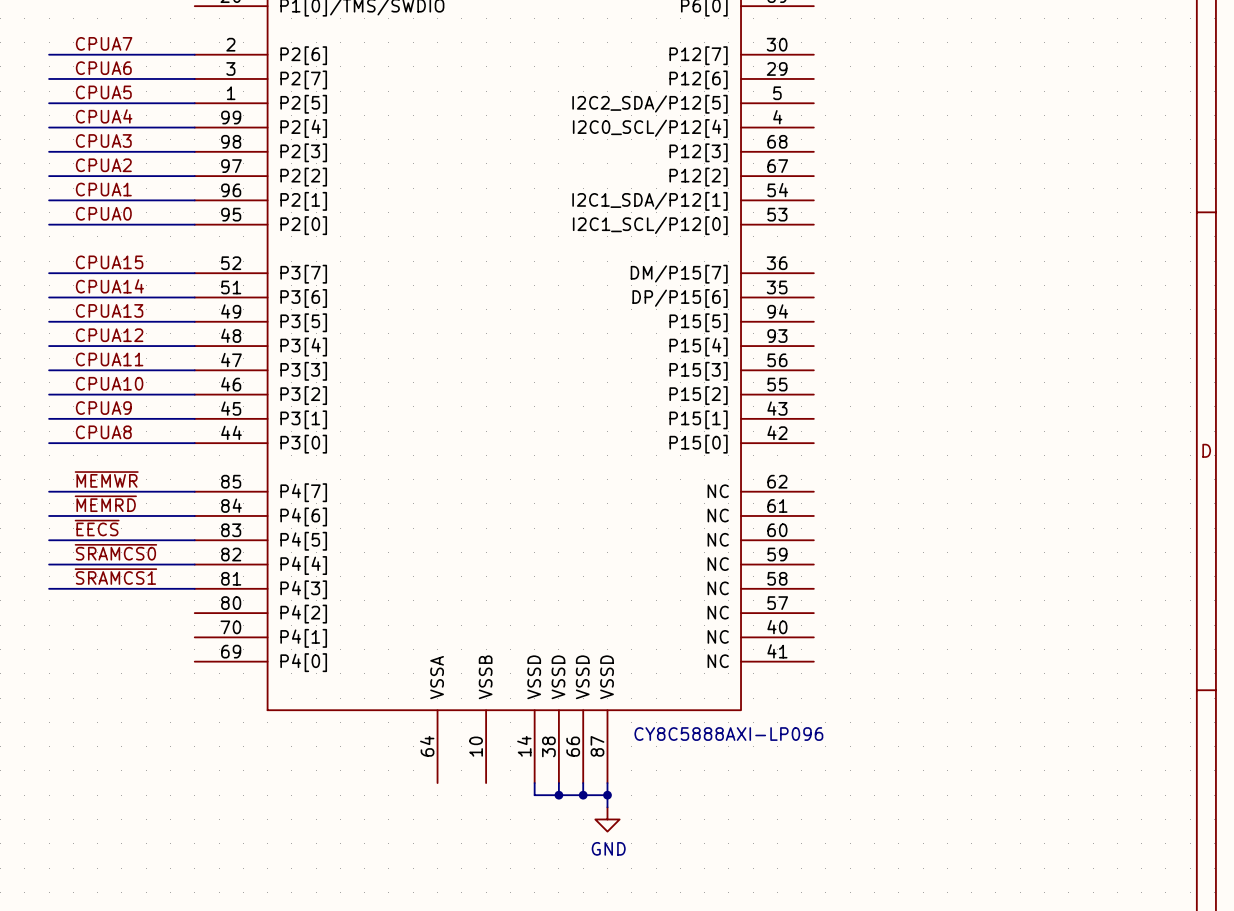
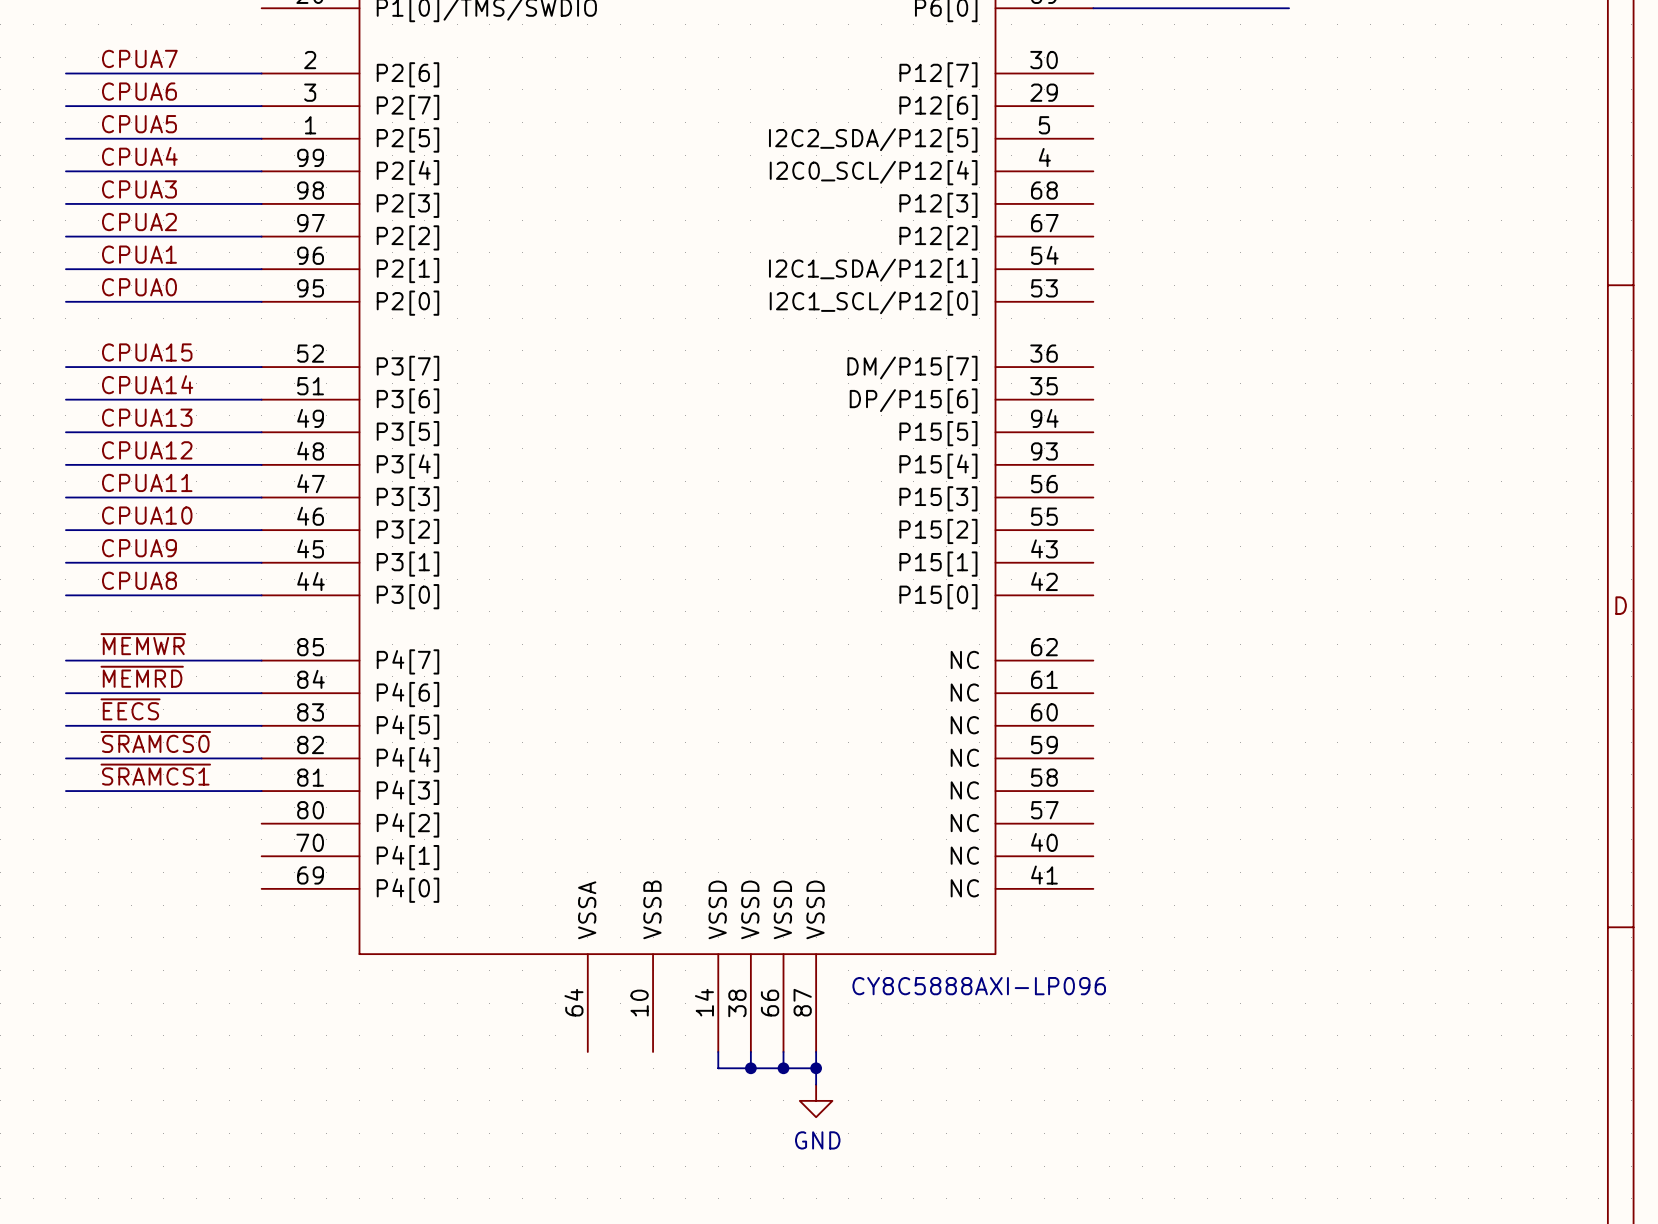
wire: none -> (1093, 8) (1289, 8)

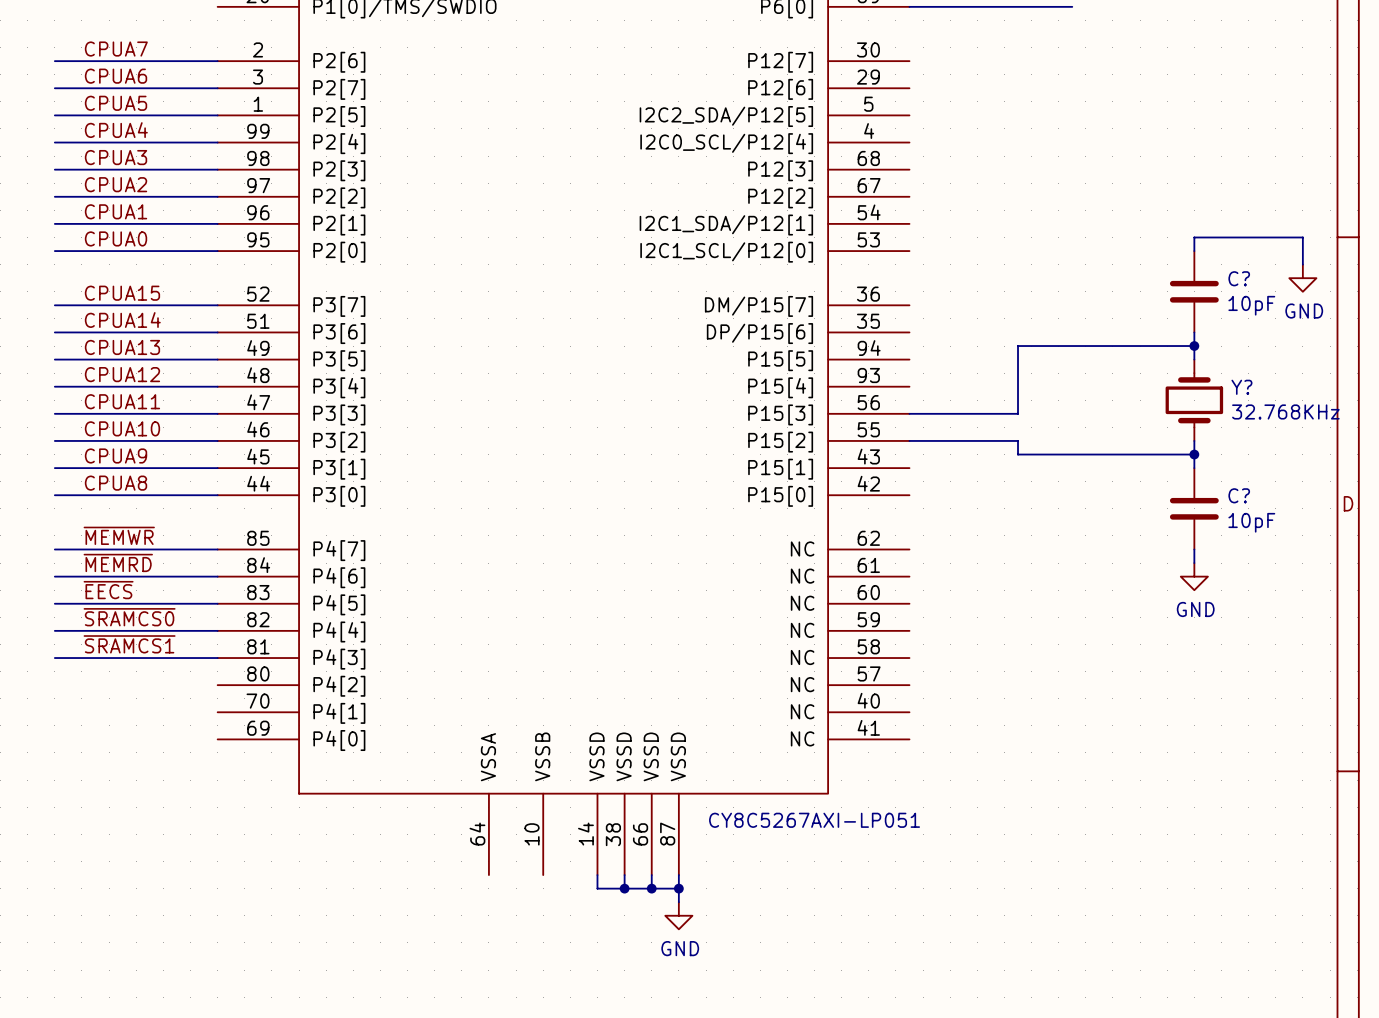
wire: none -> (1194, 251) (1194, 237) (1302, 237) (1302, 264)
power symbol: none -> GND (1302, 278)
C?: none -> 10pF (1194, 291)
wire: none -> (1194, 332) (1194, 359)
wire: none -> (1194, 346) (1018, 346) (1018, 413) (909, 413)
junction: none -> (1194, 346)
Y?: none -> 32.768KHz (1194, 400)
wire: none -> (909, 440) (1018, 440) (1018, 454) (1194, 454)
wire: none -> (1194, 440) (1194, 468)
junction: none -> (1194, 454)
C?: none -> 10pF (1194, 508)
wire: none -> (1194, 549) (1194, 563)
power symbol: none -> GND (1194, 576)
part value: CY8C5888AXI-LP096 (979, 986) -> CY8C5267AXI-LP051 (814, 820)

